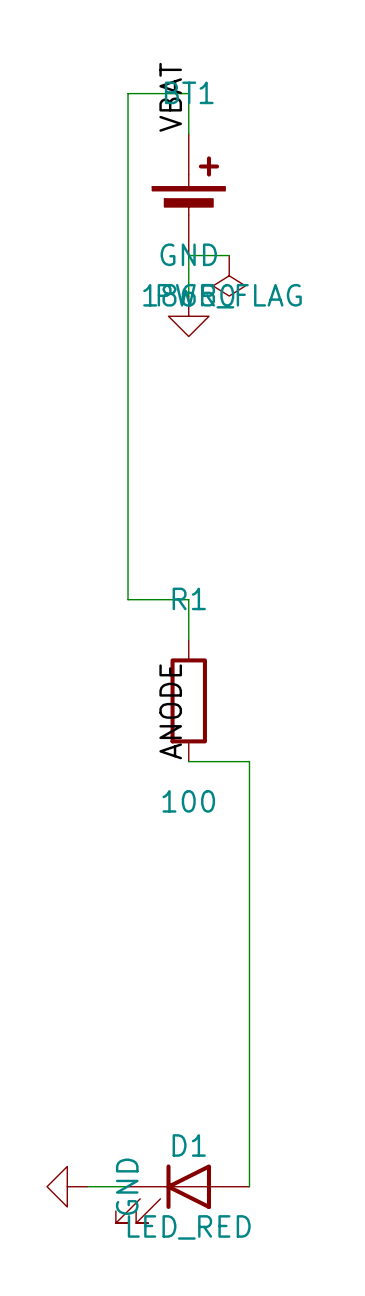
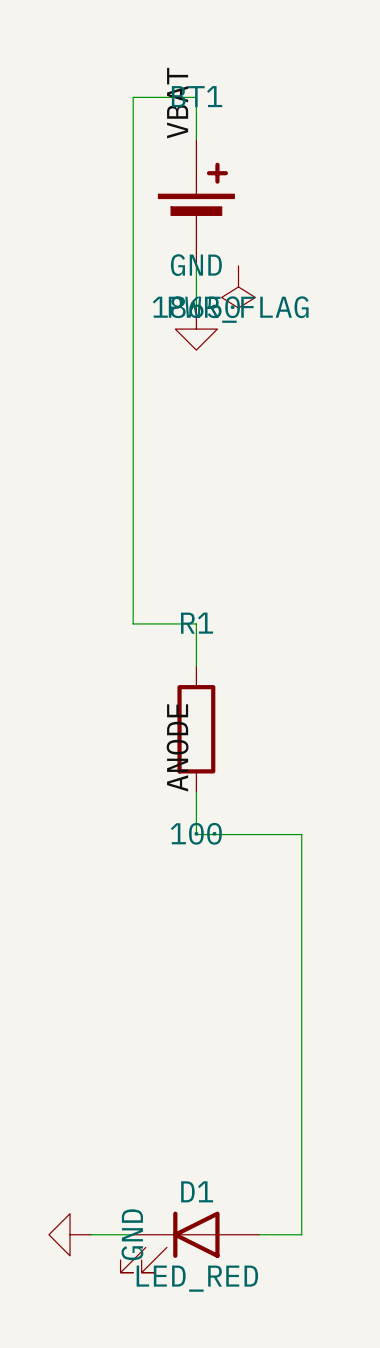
wire: (188, 255) (229, 255) -> none
wire: (188, 761) (249, 761) (249, 1186) -> (196, 792) (196, 834) (301, 834) (301, 1234) (259, 1234)

